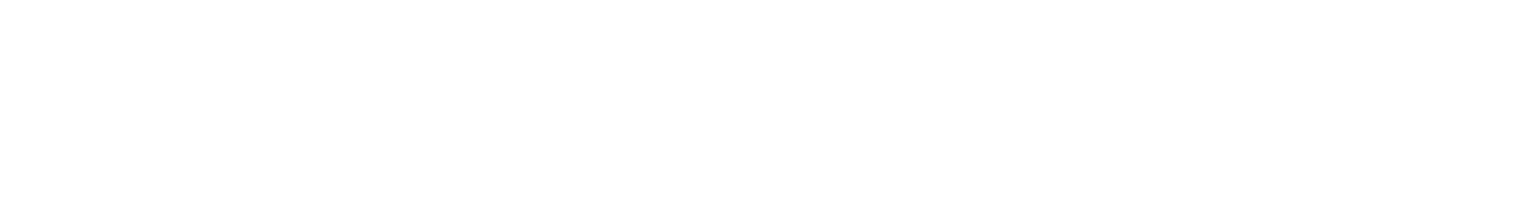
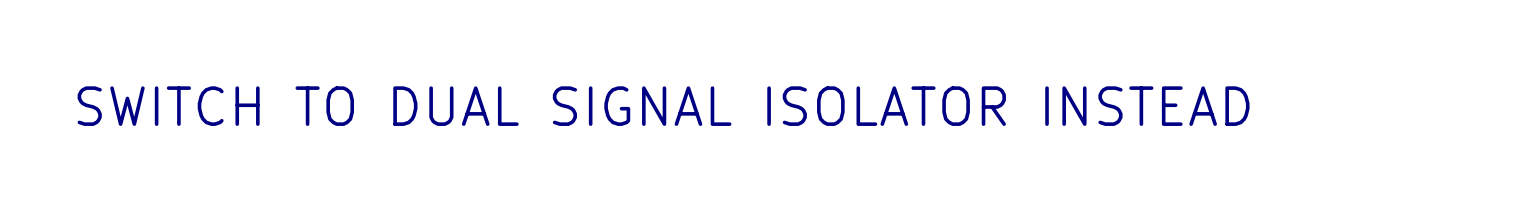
text: none -> SWITCH TO DUAL SIGNAL ISOLATOR INSTEAD (663, 106)

